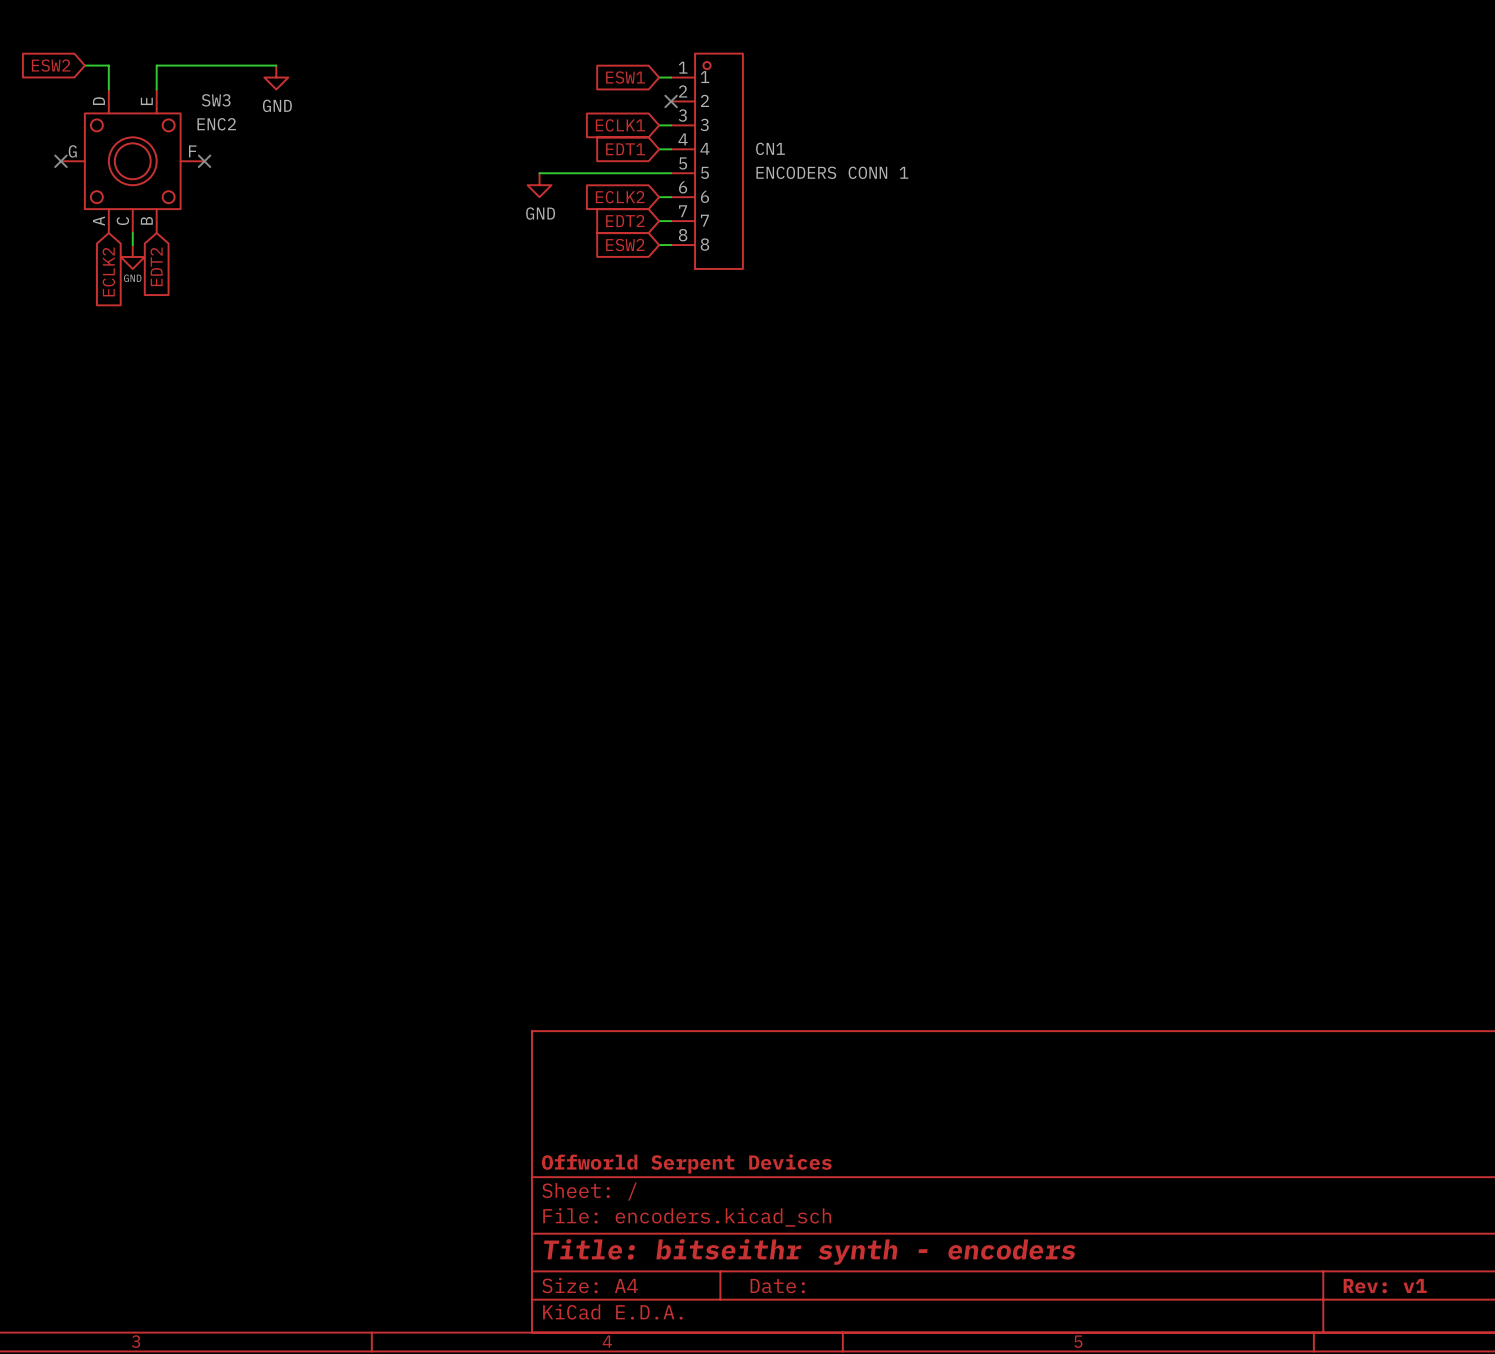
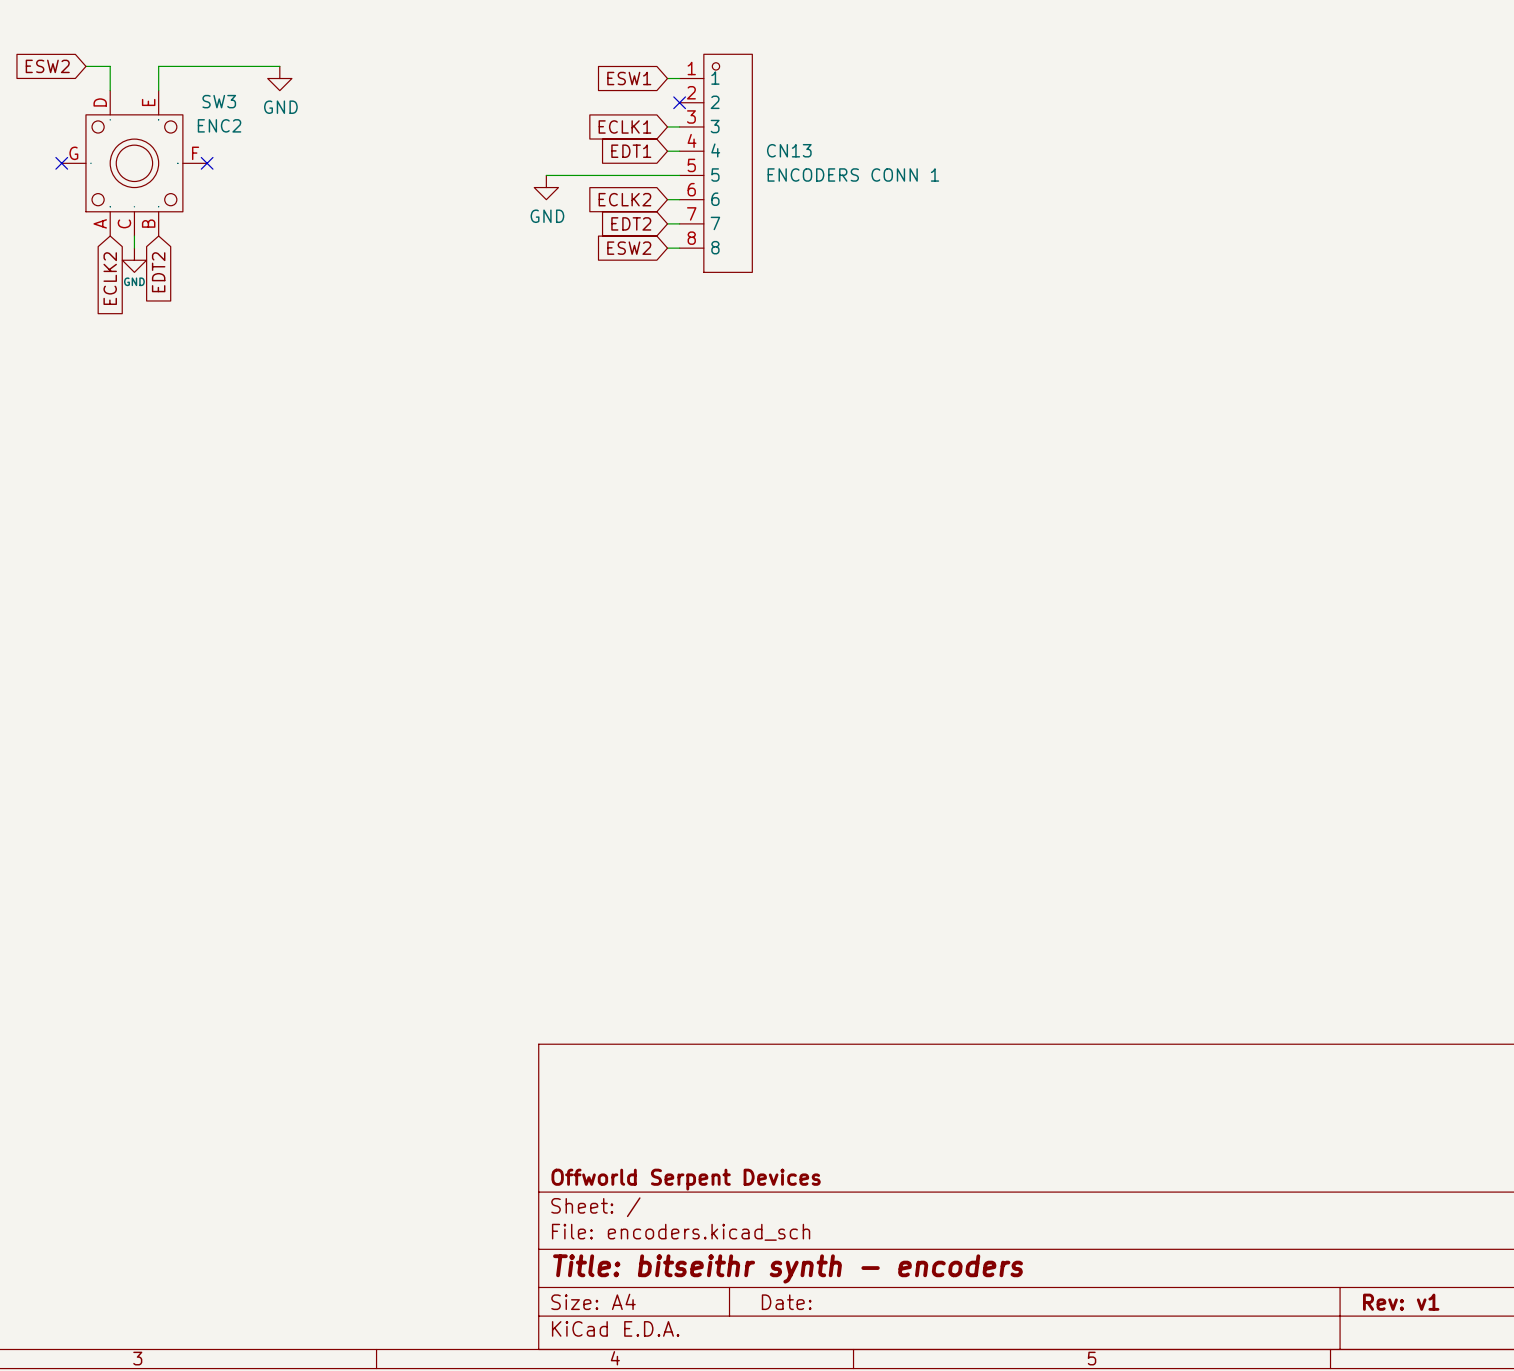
CN1 name: CN1 (770, 148) -> CN13 (789, 150)

